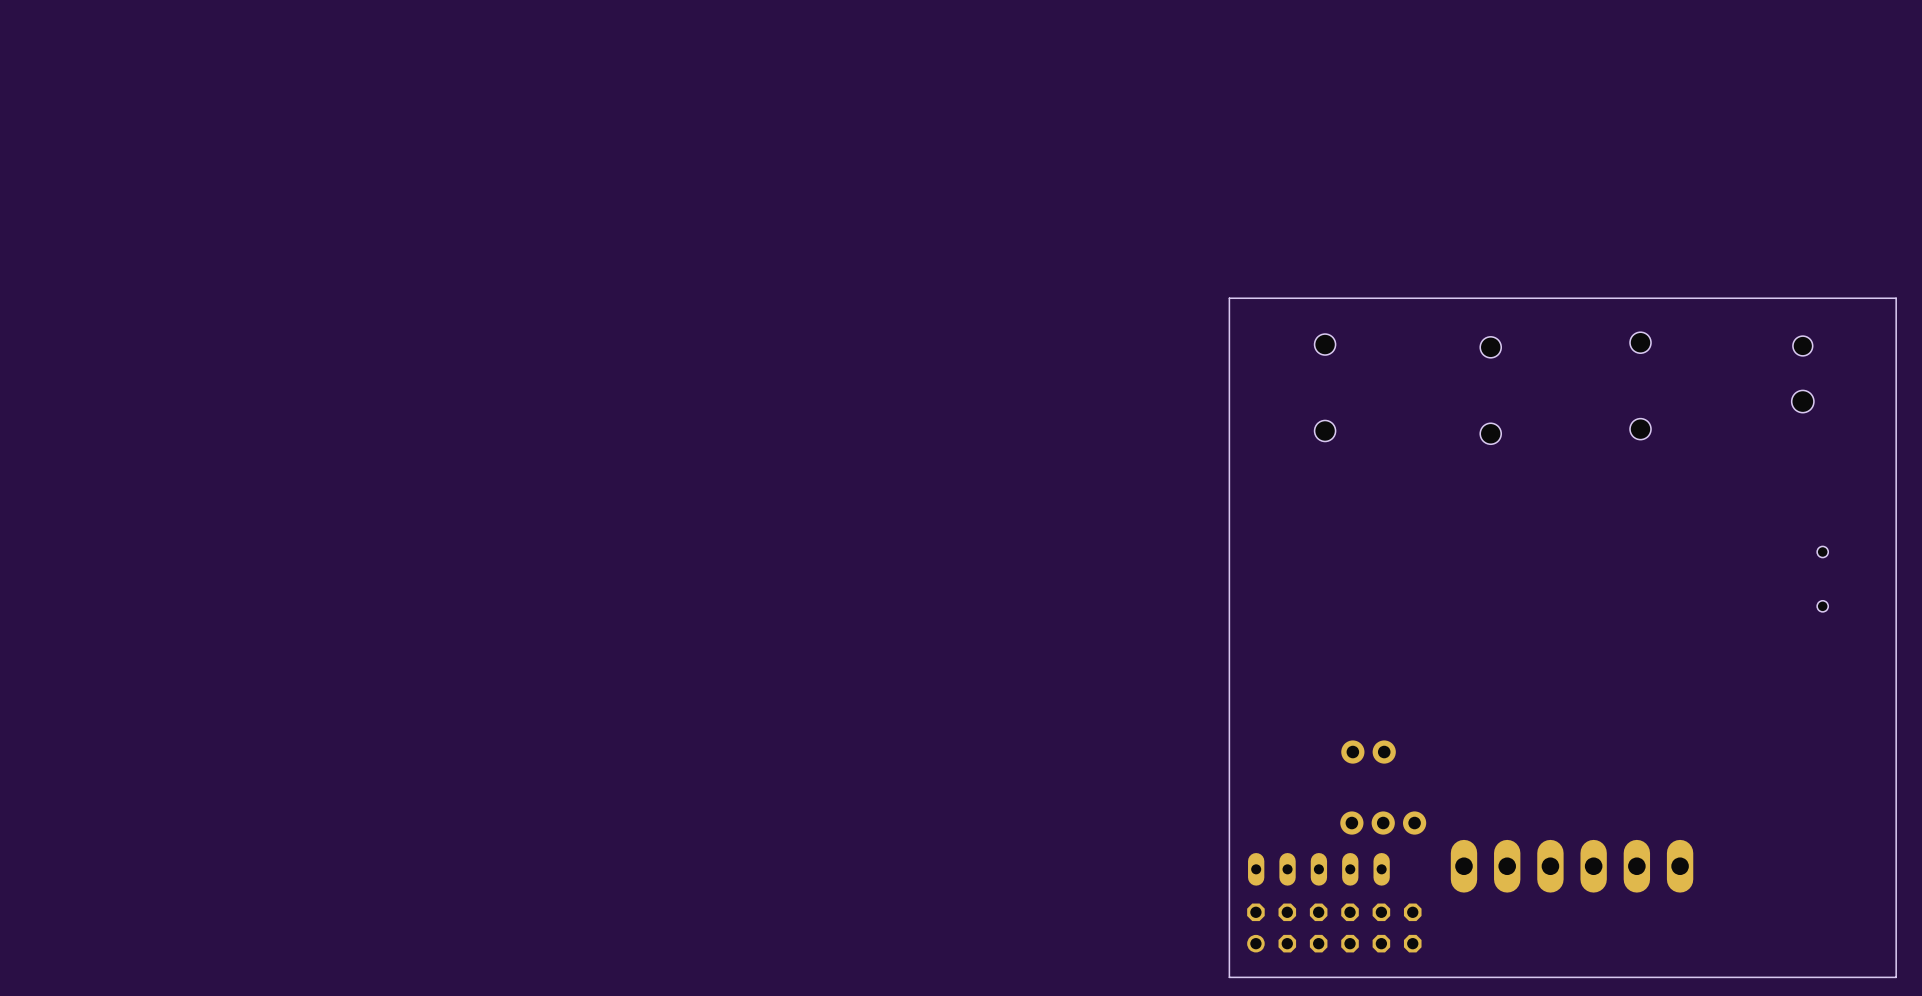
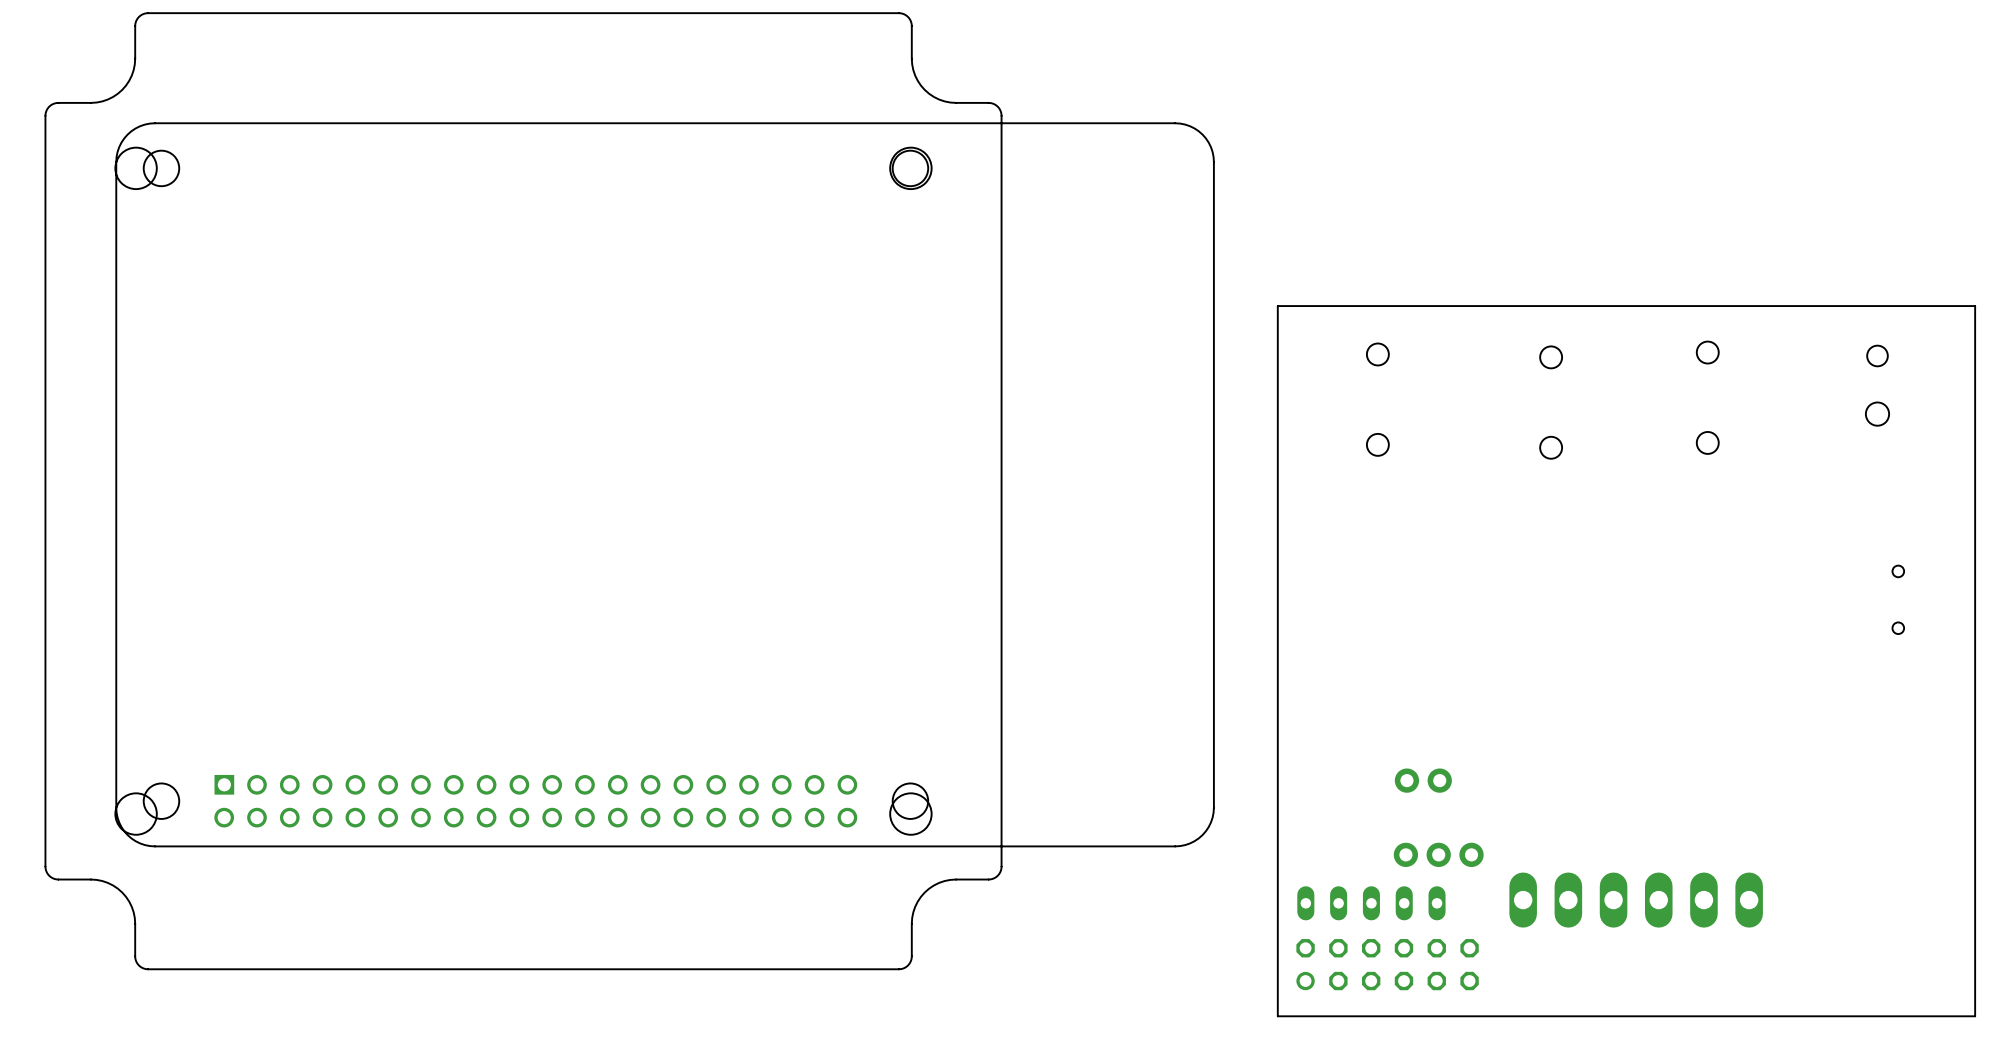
board edge: none -> (898, 13) (146, 13) (140, 15) (135, 22) (133, 70) (129, 80) (122, 89) (113, 96) (102, 101) (56, 103) (48, 107) (45, 115) (45, 868) (48, 874) (55, 879) (102, 881) (113, 885) (122, 892) (129, 901) (133, 912) (135, 958) (140, 966) (148, 969) (900, 969) (906, 966) (911, 959) (913, 912) (917, 901) (924, 892) (933, 885) (944, 881) (990, 879) (998, 874) (1001, 866) (1001, 114) (997, 106) (991, 103) (944, 101) (933, 96) (924, 89) (917, 80) (913, 70) (911, 22) (906, 15) (898, 13)
round board edge: none -> [115, 147, 157, 190]
round board edge: none -> [890, 147, 932, 190]
part: none -> (665, 484)
round board edge: none -> [115, 793, 157, 835]
round board edge: none -> [890, 793, 932, 835]

